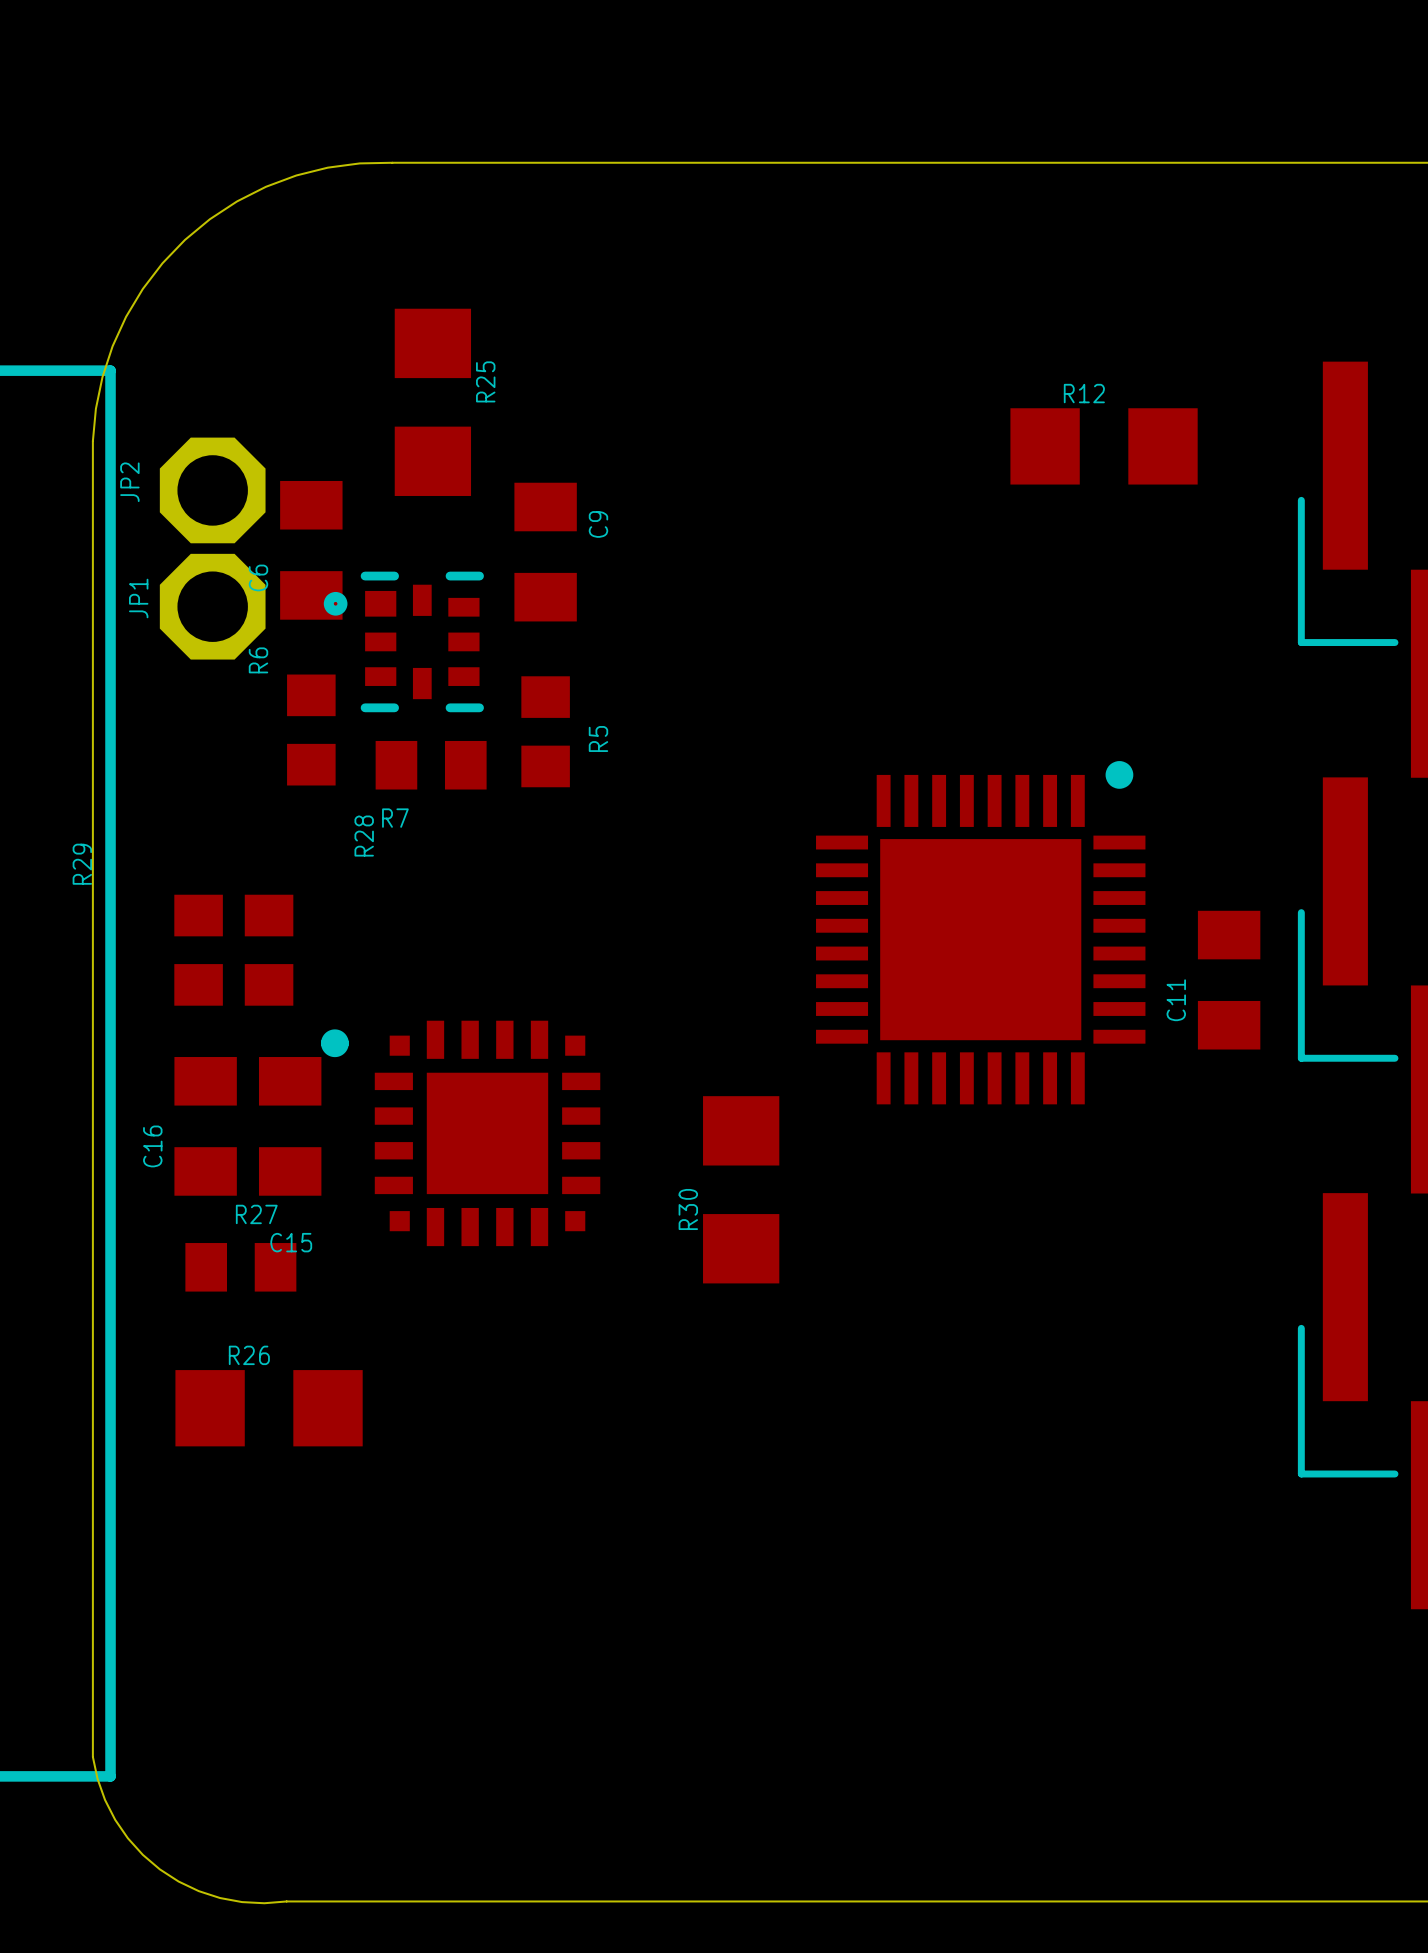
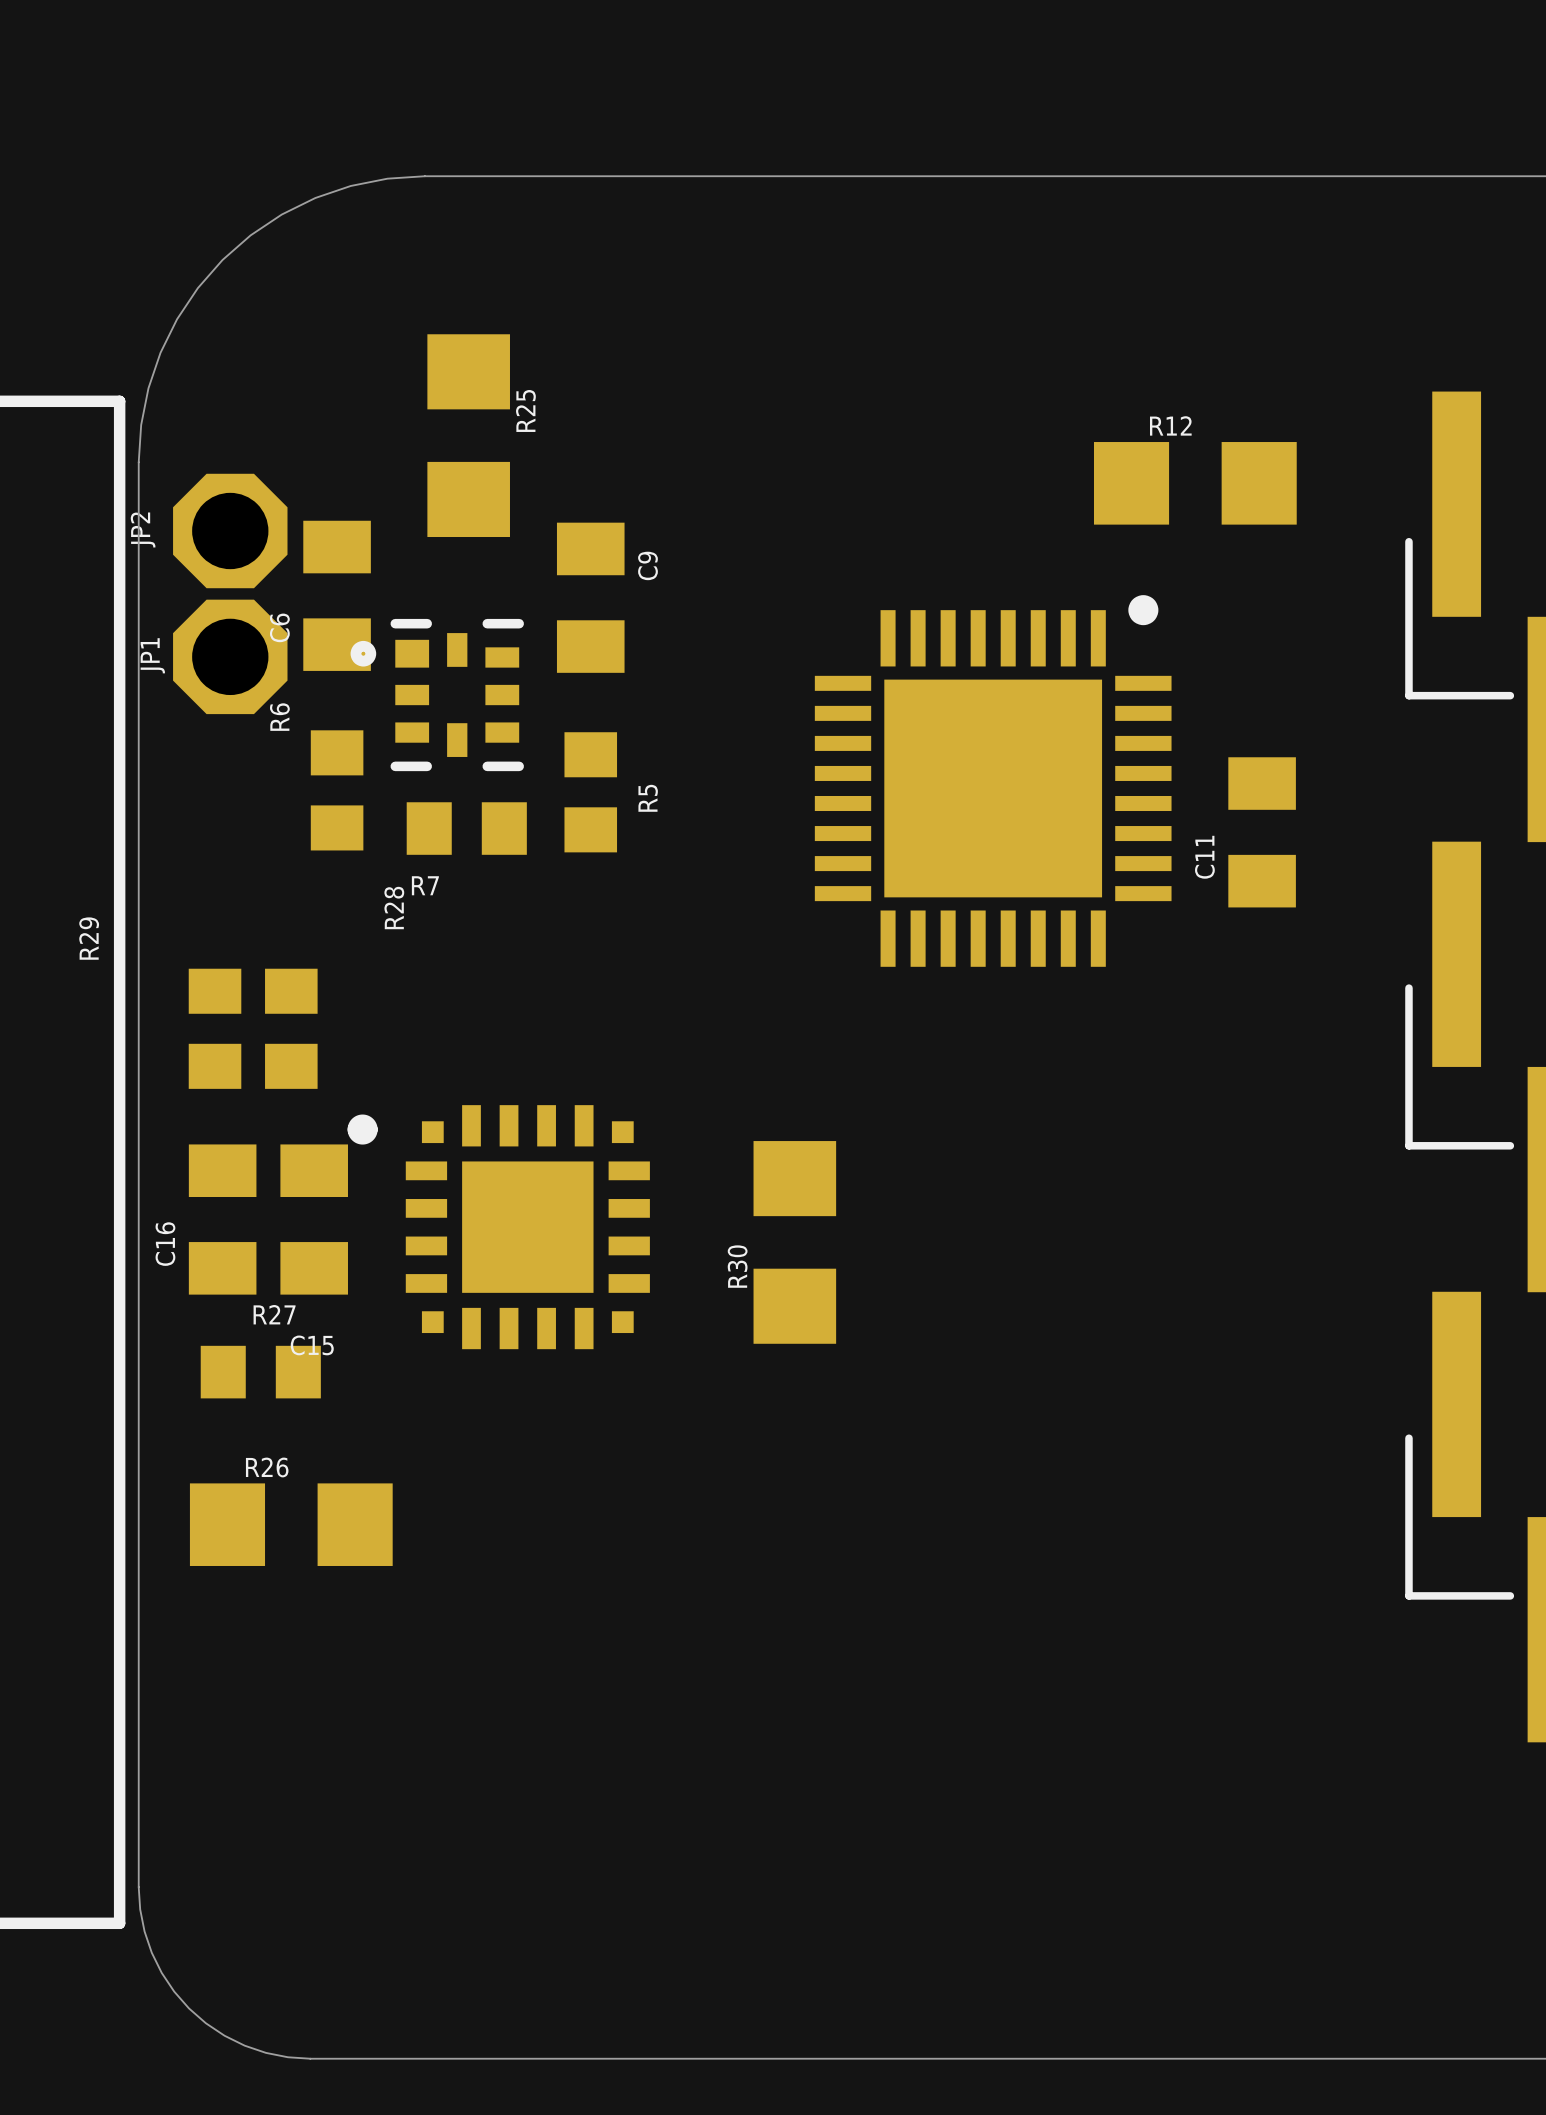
board edge: (392, 162) (359, 163) (327, 167) (296, 175) (265, 186) (237, 201) (209, 219) (184, 239) (162, 263) (142, 289) (126, 316) (112, 346) (102, 377) (95, 408) (92, 441) (92, 1757) (105, 1799) (115, 1819) (127, 1838) (159, 1869) (178, 1881) (220, 1898) (264, 1903) (286, 1901) -> (424, 176) (387, 178) (350, 185) (315, 198) (281, 214) (250, 235) (222, 260) (197, 288) (177, 319) (160, 352) (148, 388) (141, 424) (138, 462) (140, 1909) (144, 1931) (161, 1972) (174, 1991) (205, 2023) (244, 2045) (265, 2052) (310, 2058)
part position: (980, 932) -> (993, 780)
C11 position: (1229, 980) -> (1262, 832)
R30 position: (741, 1189) -> (794, 1242)

